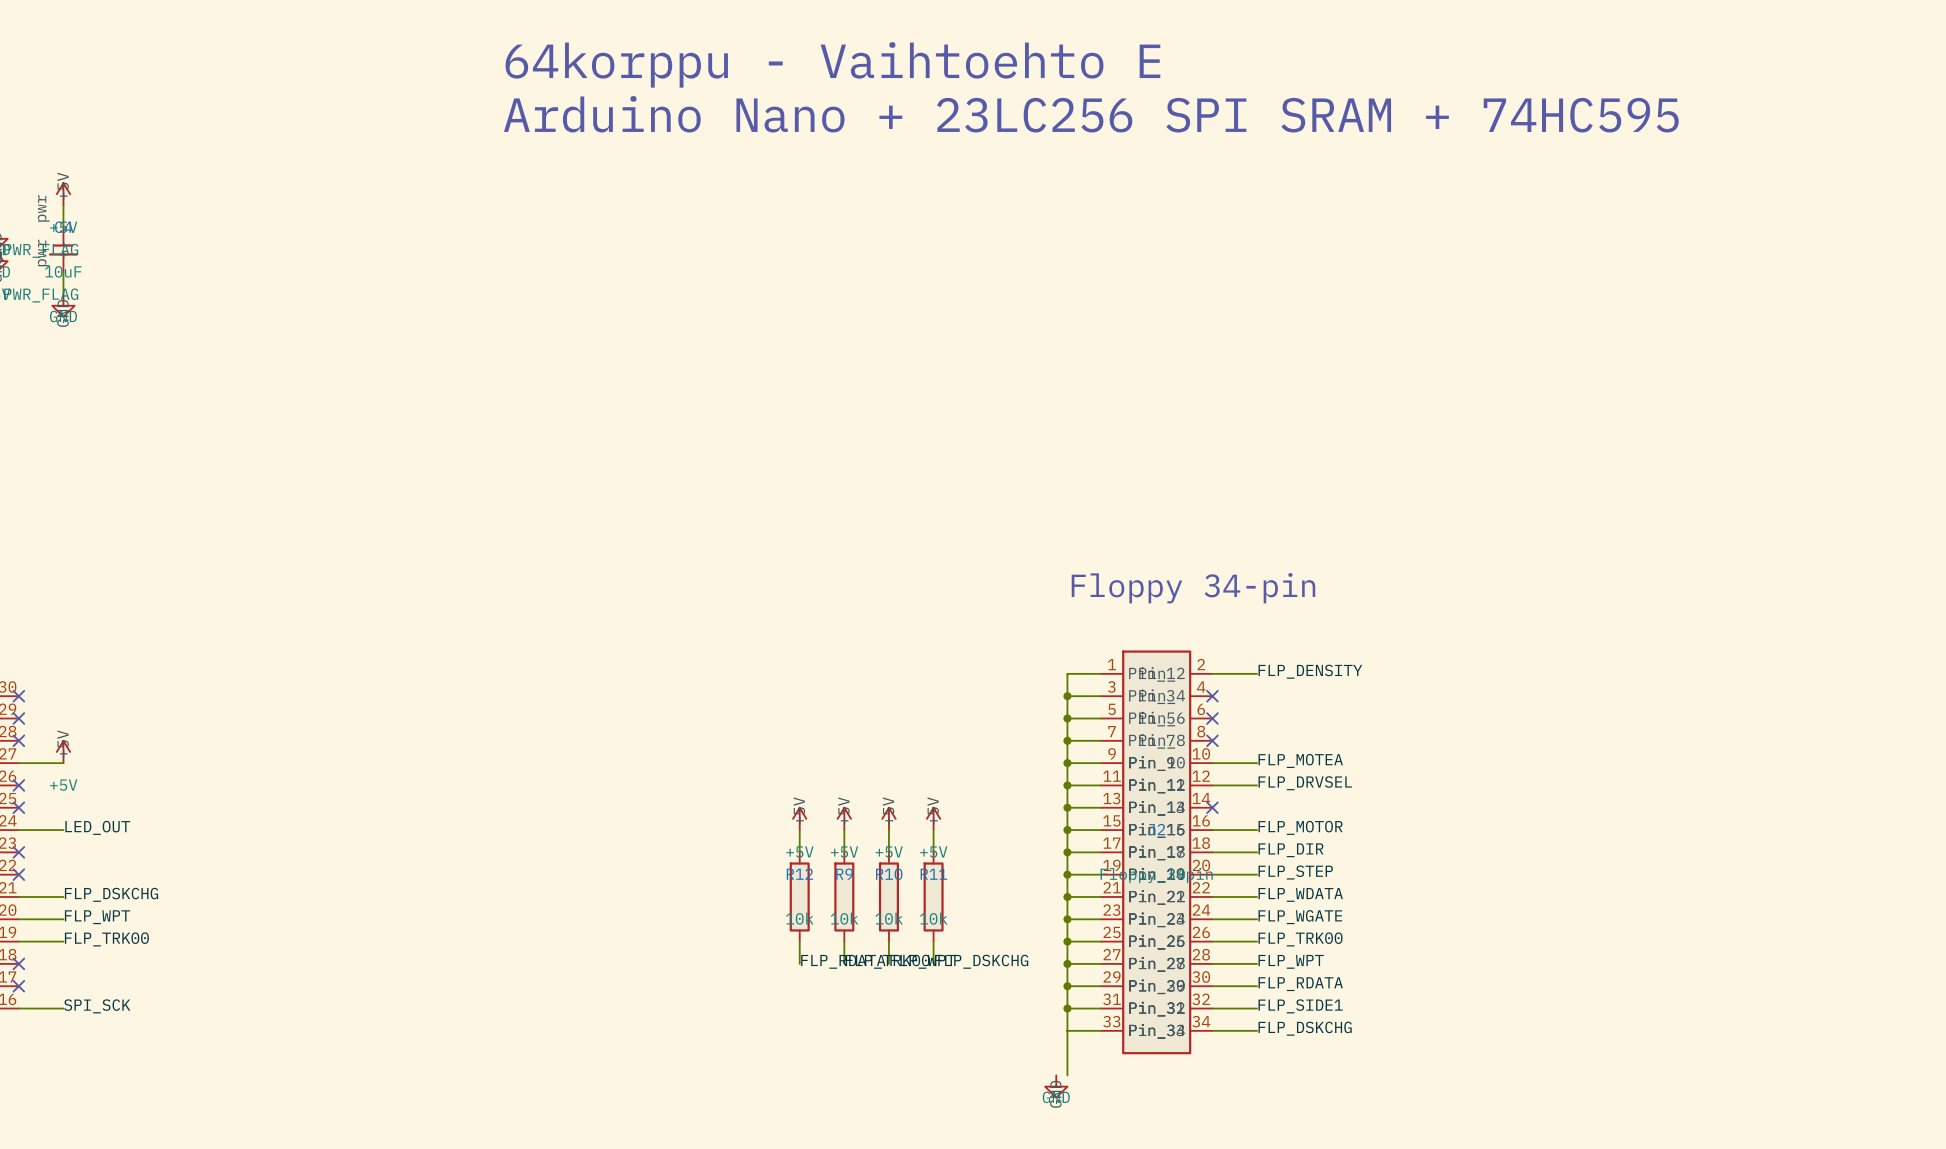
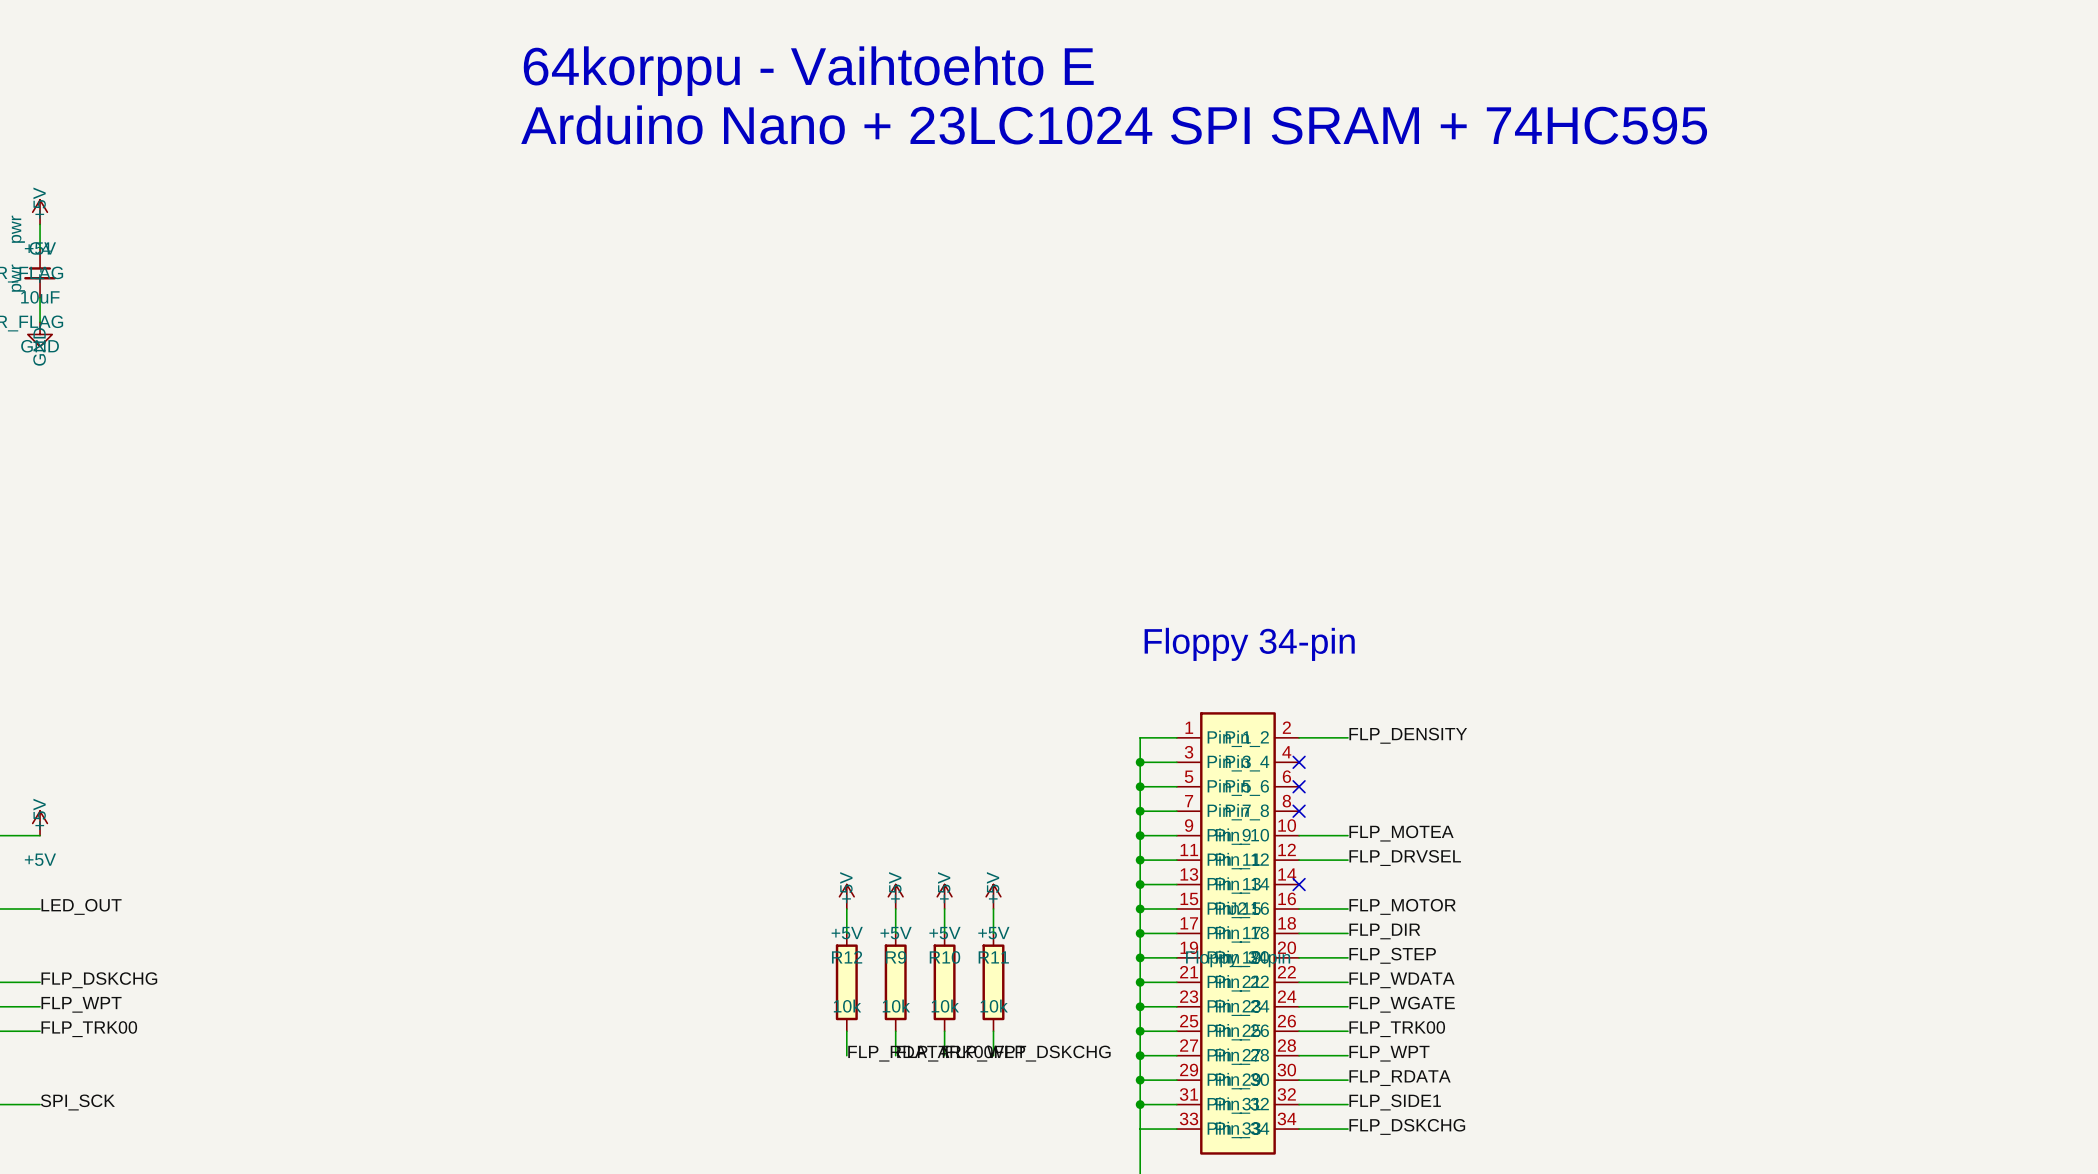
text: Arduino Nano + 23LC256 SPI SRAM + 74HC595 (1091, 114) -> Arduino Nano + 23LC1024 SPI SRAM + 74HC595 (1114, 124)

